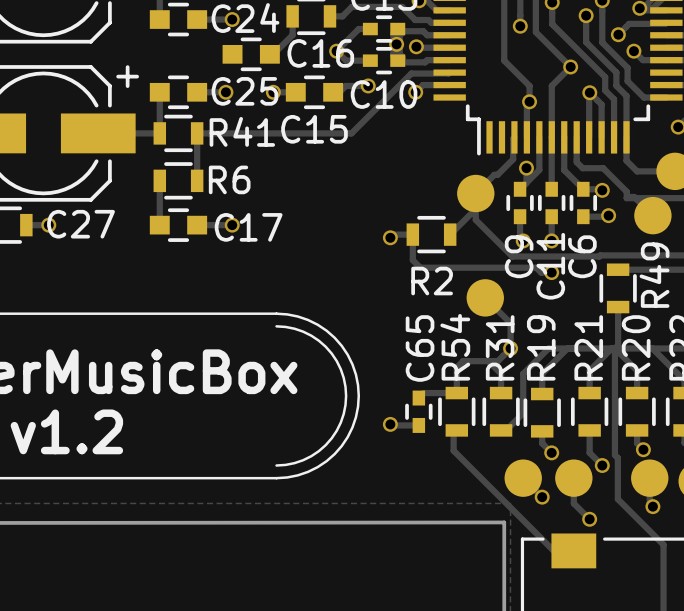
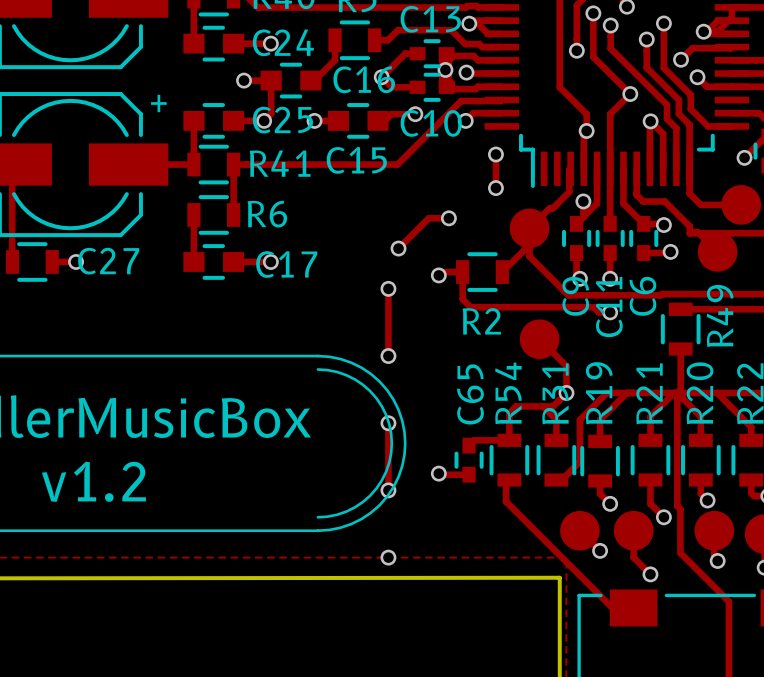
track: none -> (244, 80) (271, 80) (271, 113) (264, 120)
via: none -> (244, 80)
track: none -> (495, 154) (495, 188)
via: none -> (495, 154)
via: none -> (495, 188)
track: none -> (448, 218) (428, 218) (398, 248)
via: none -> (448, 218)
via: none -> (398, 248)
track: none -> (388, 288) (388, 356)
via: none -> (388, 288)
via: none -> (388, 356)
track: none -> (388, 423) (388, 490)
via: none -> (388, 423)
via: none -> (388, 490)
via: none -> (388, 557)

